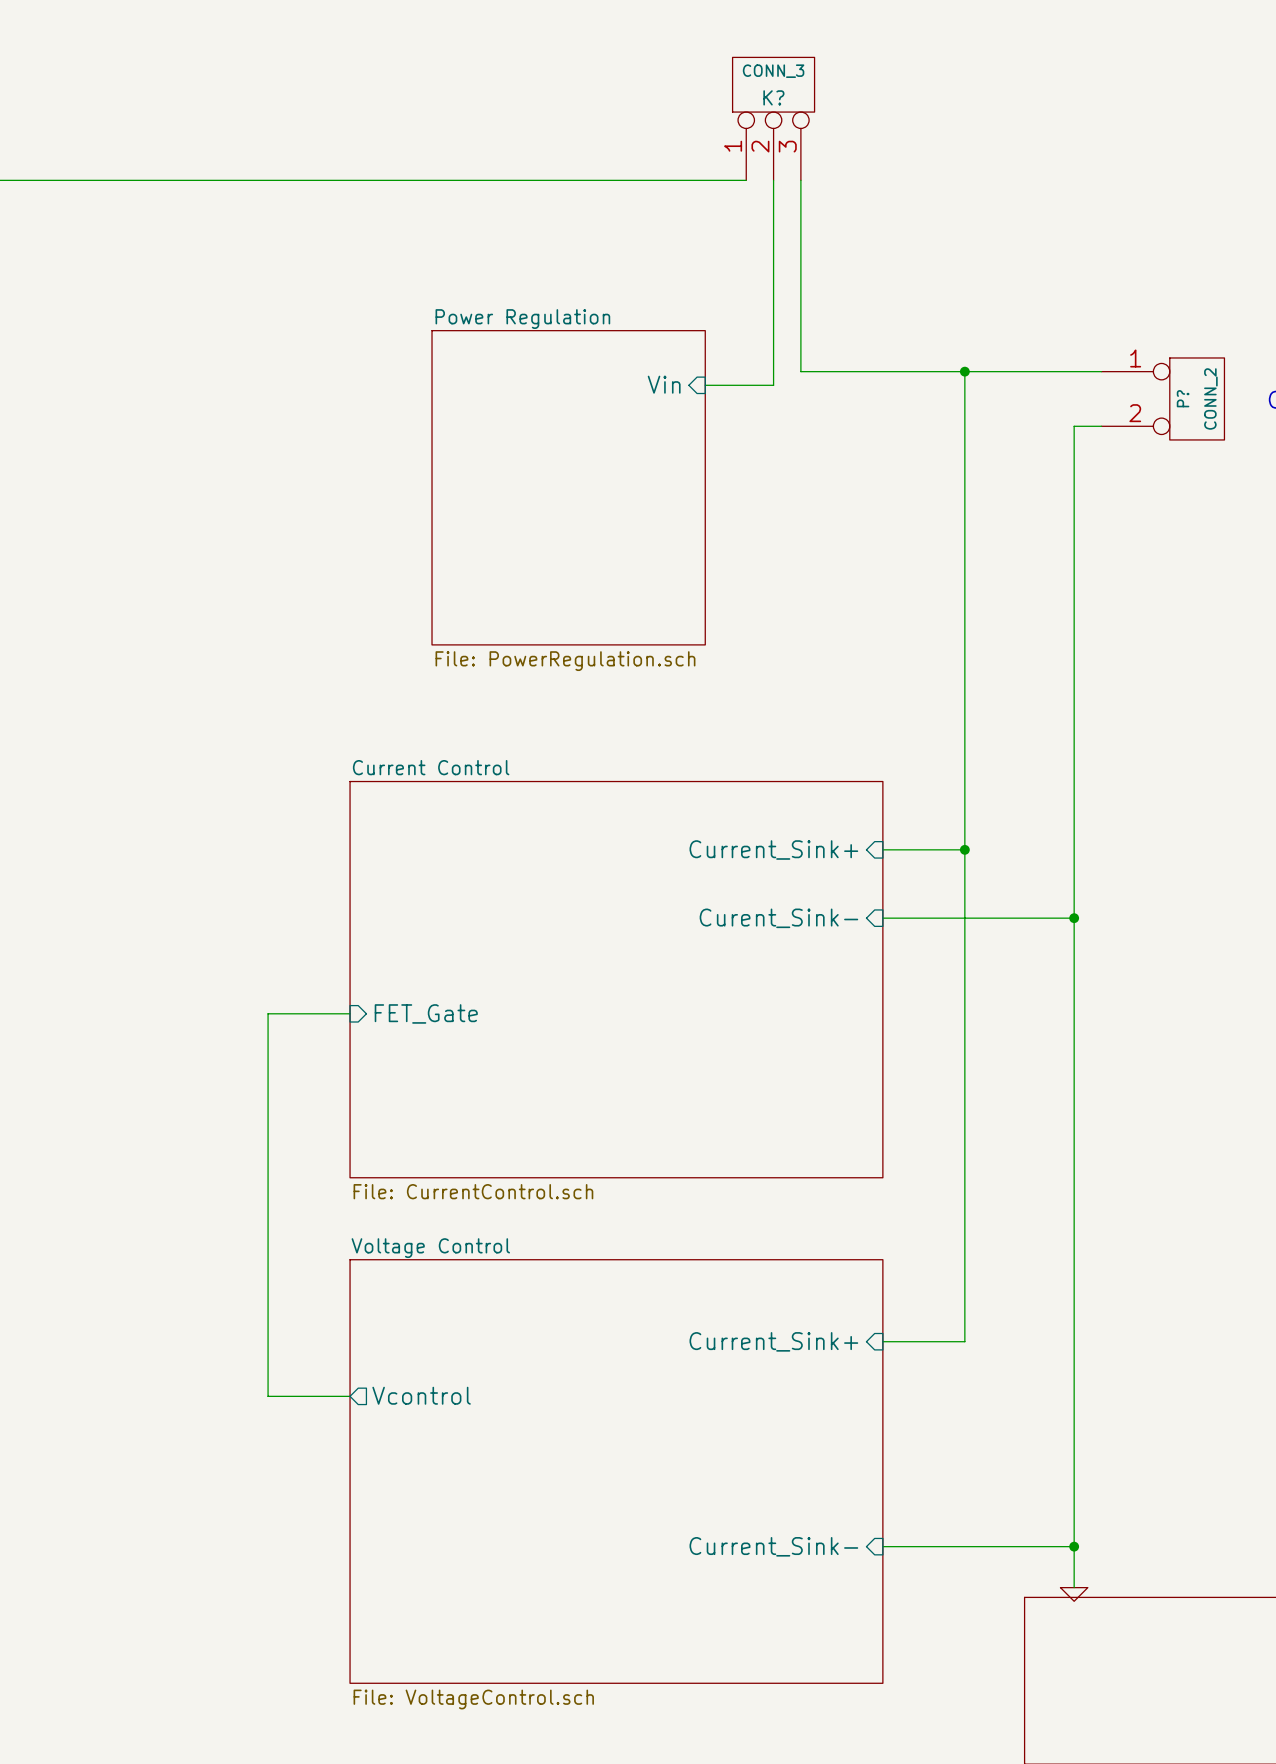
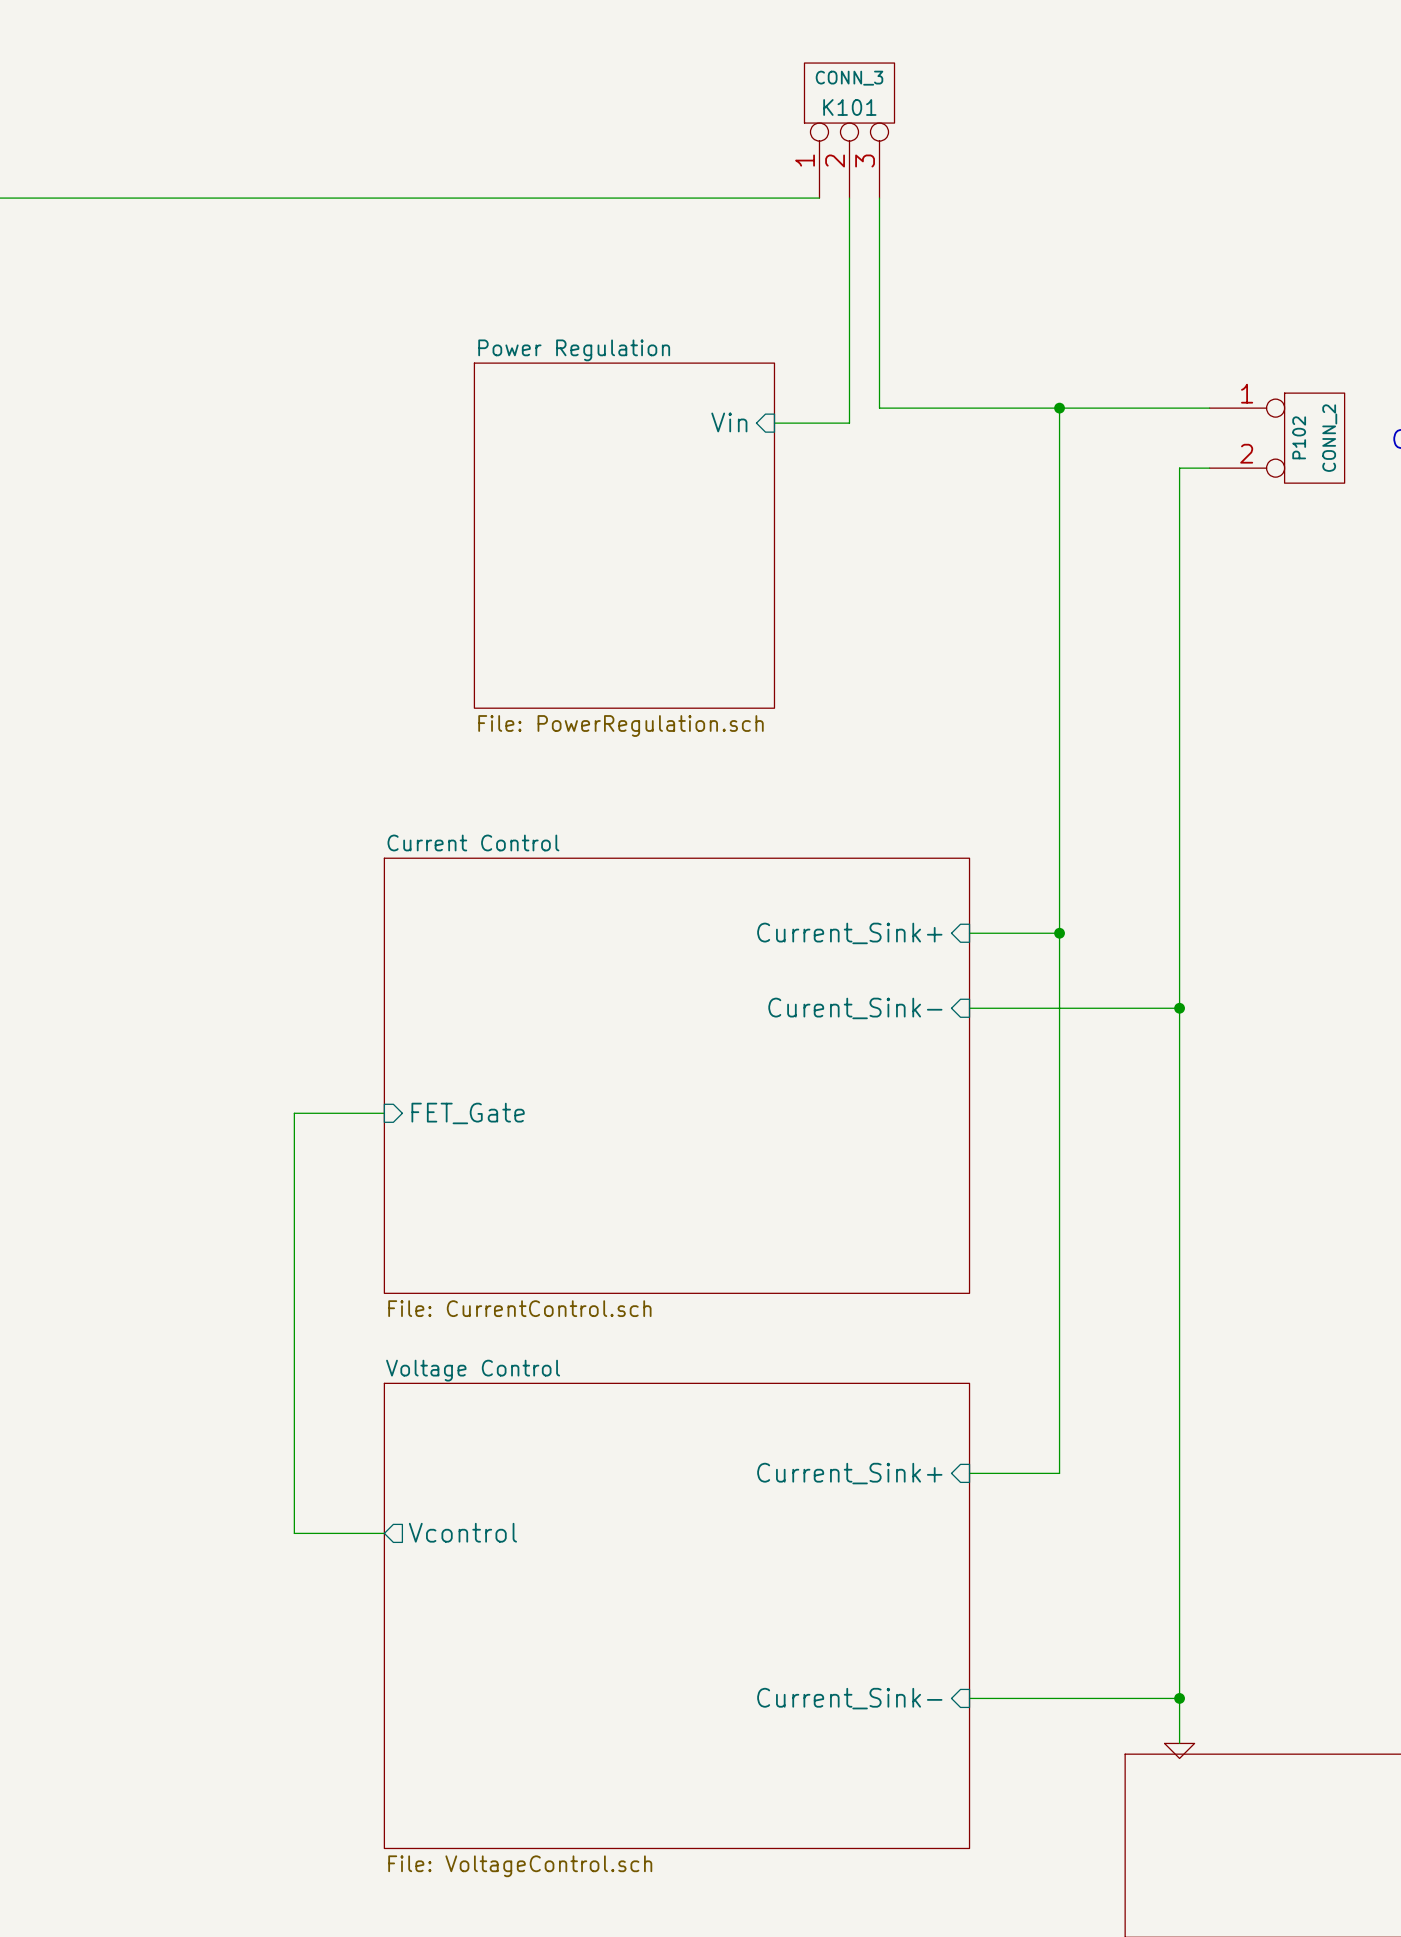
K? name: K? (773, 97) -> K101 (849, 107)
P? name: P? (1183, 398) -> P102 (1299, 437)

